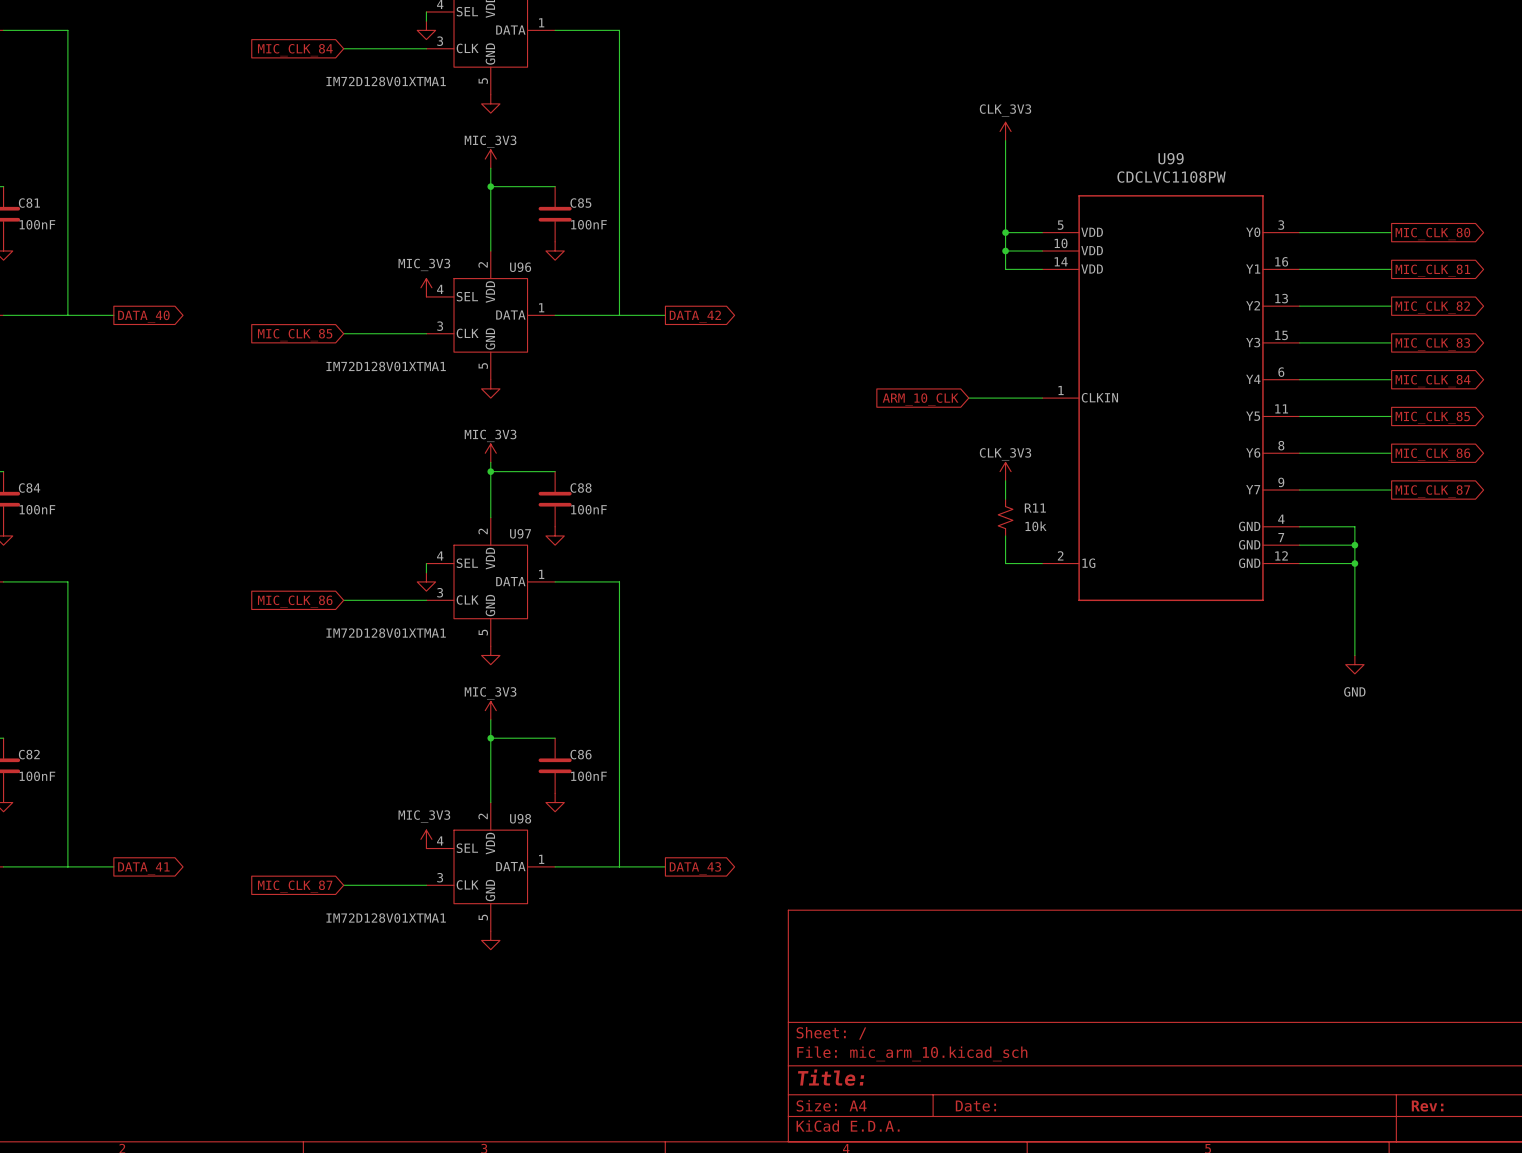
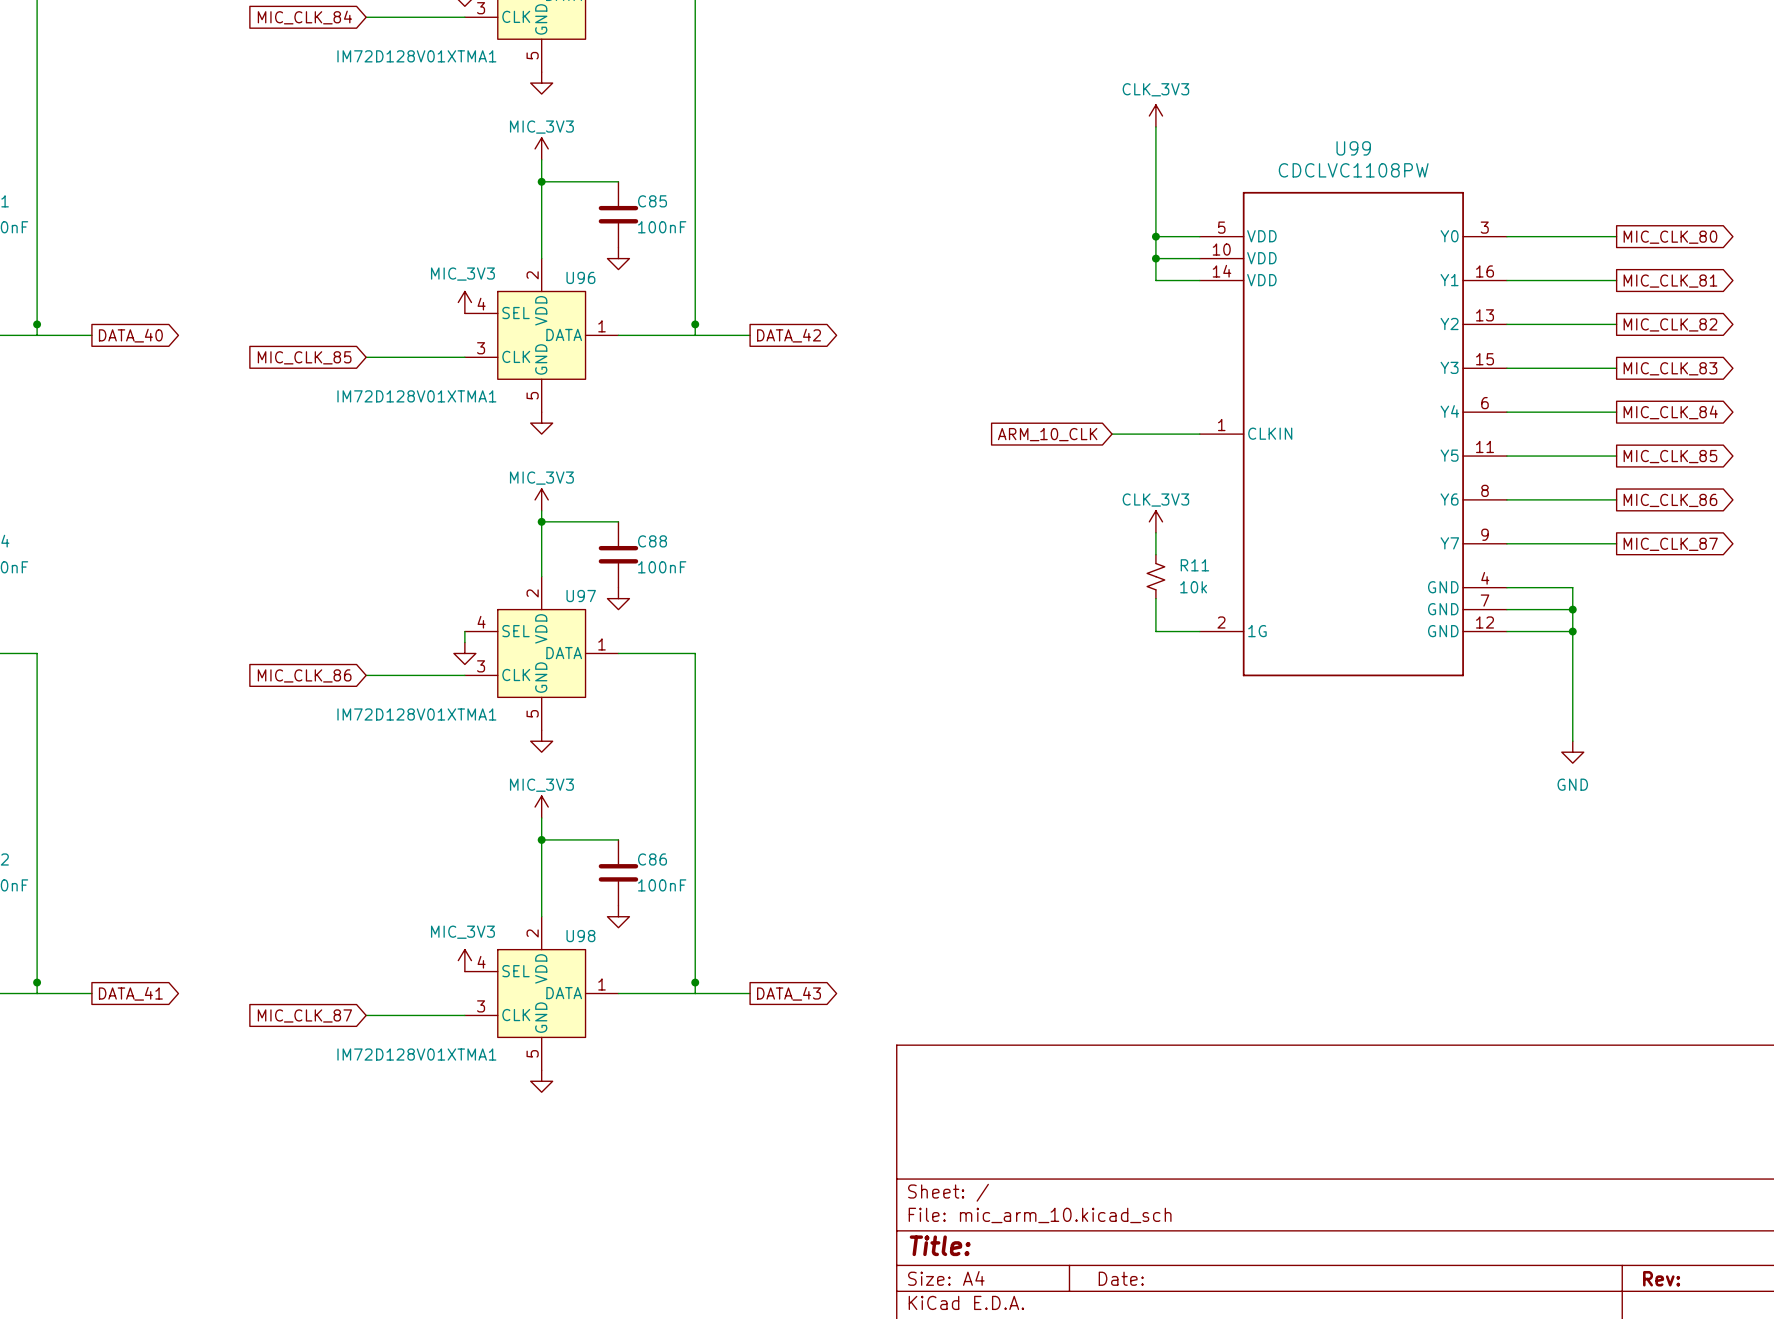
junction: none -> (37, 324)
junction: none -> (695, 324)
junction: none -> (37, 982)
junction: none -> (695, 982)

